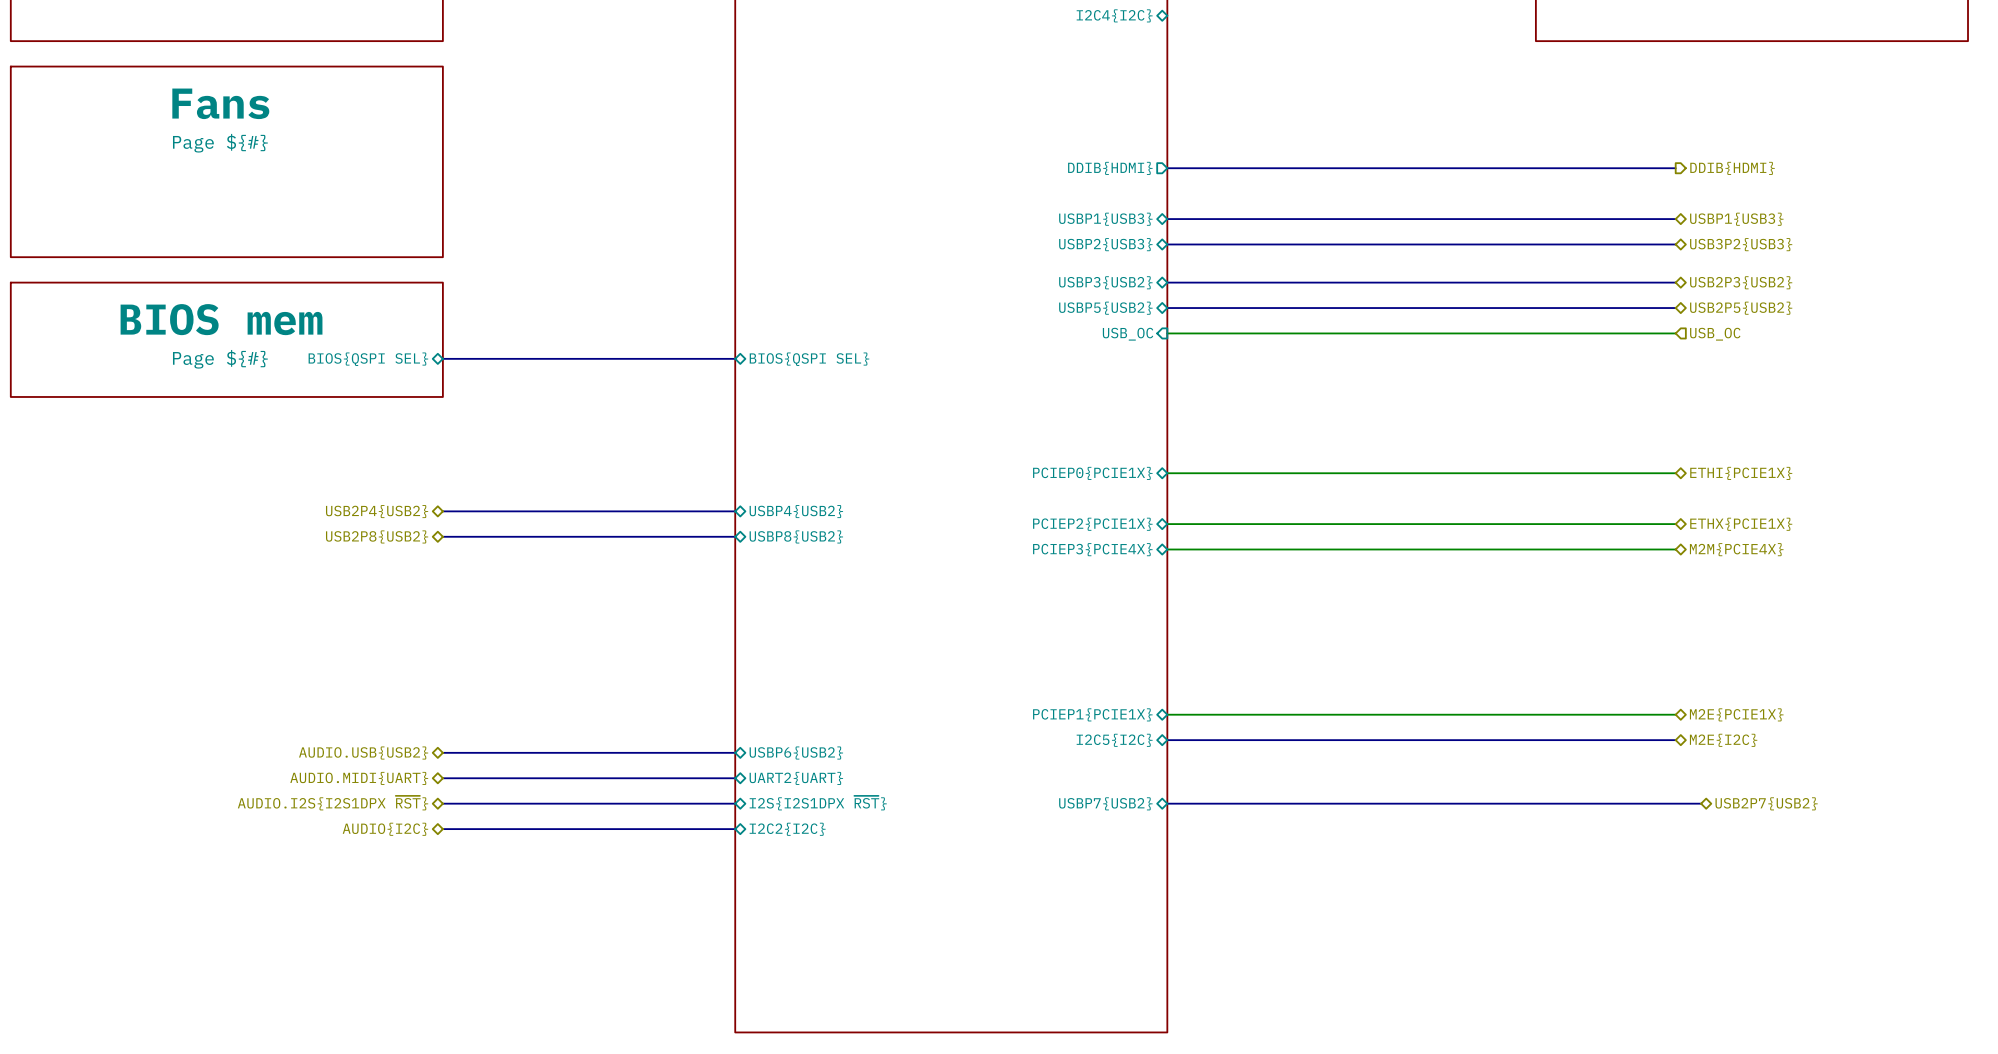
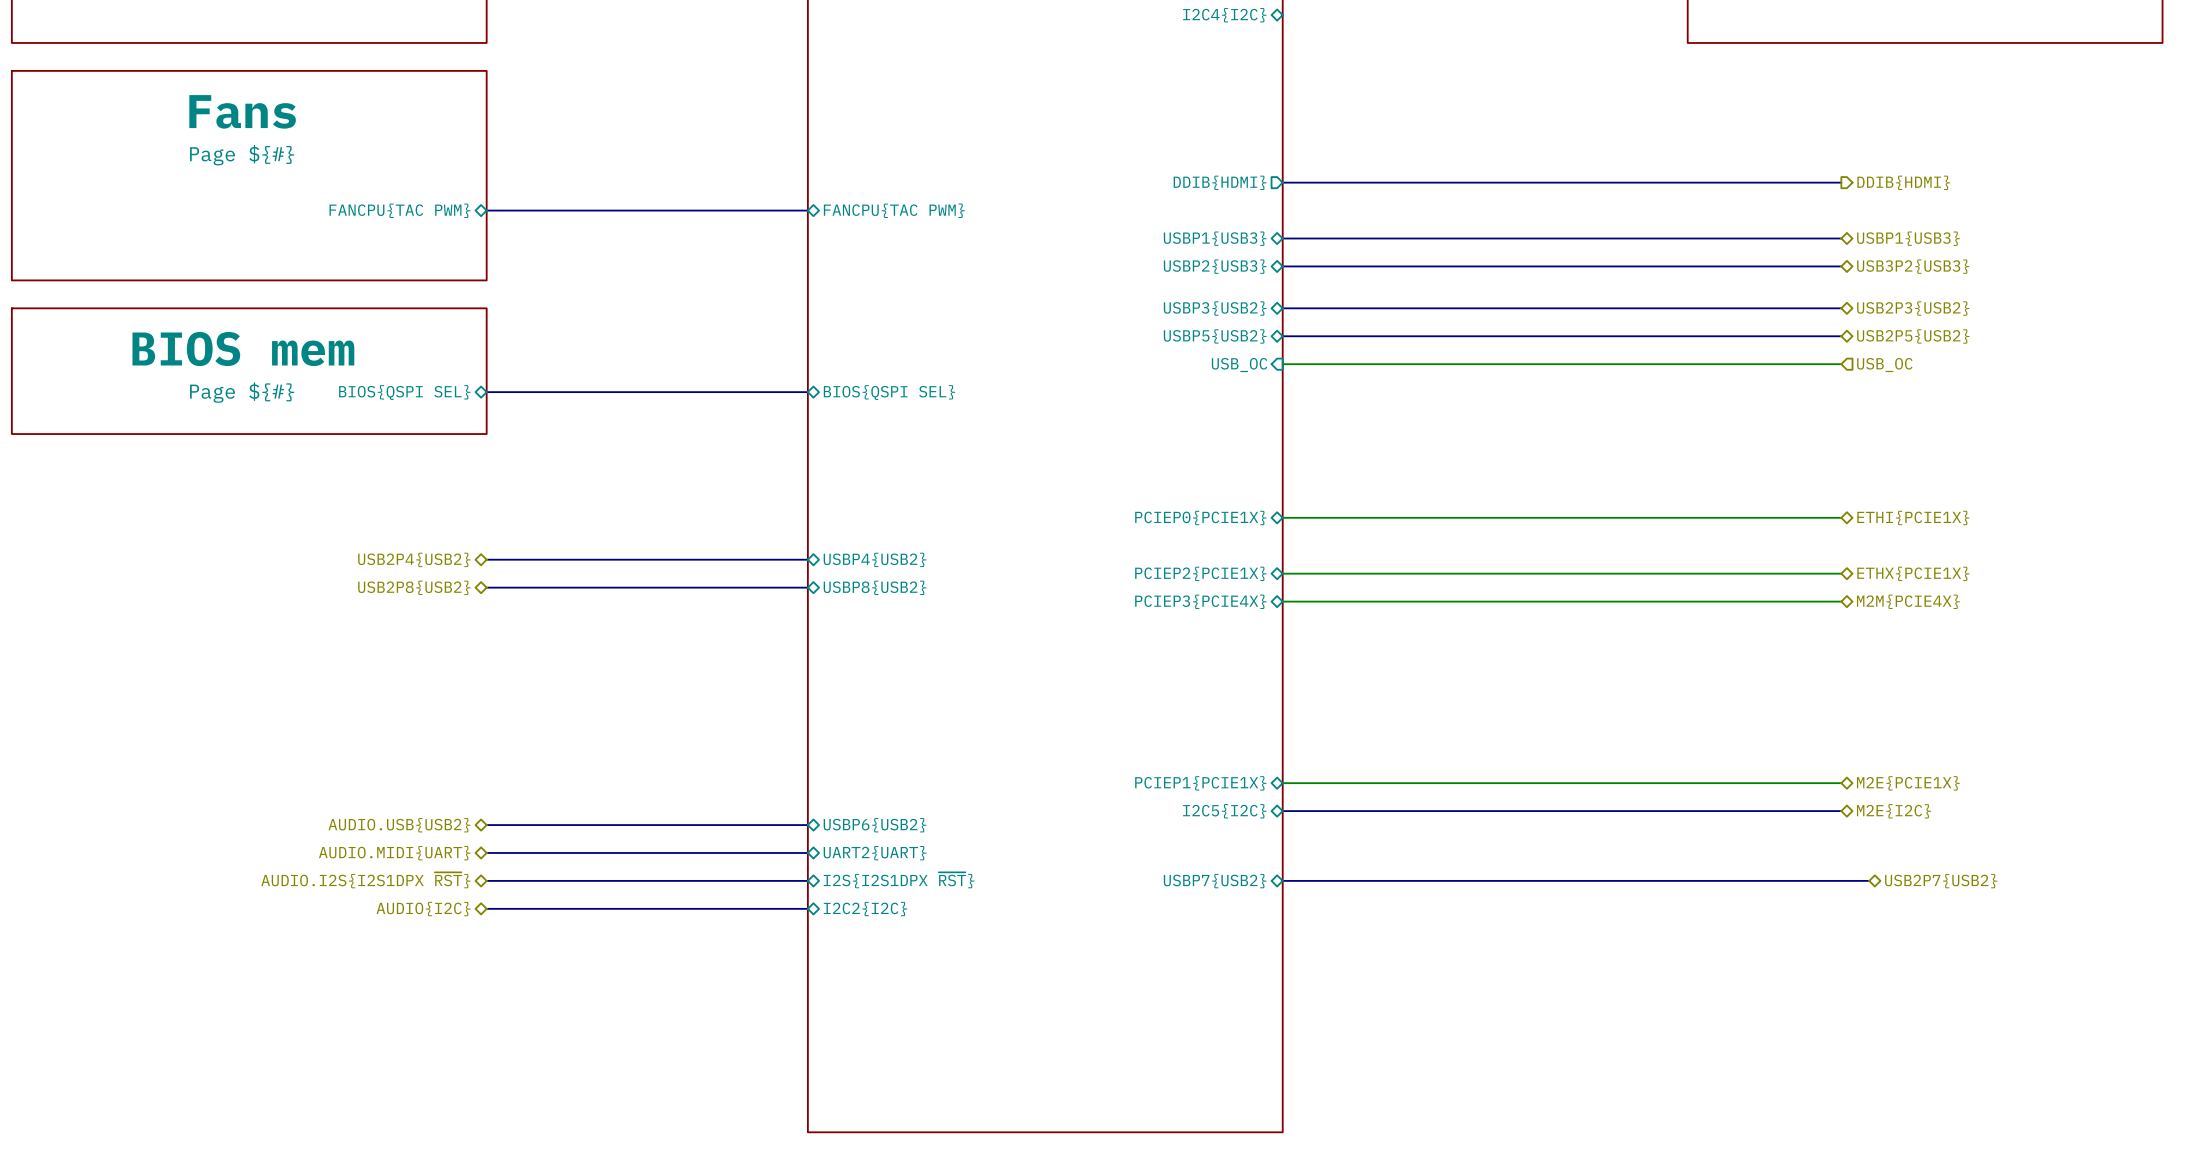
sheet pin: none -> FANCPU{TAC PWM} (400, 210)
bus: none -> (486, 210) (807, 210)
sheet pin: none -> FANCPU{TAC PWM} (894, 210)

